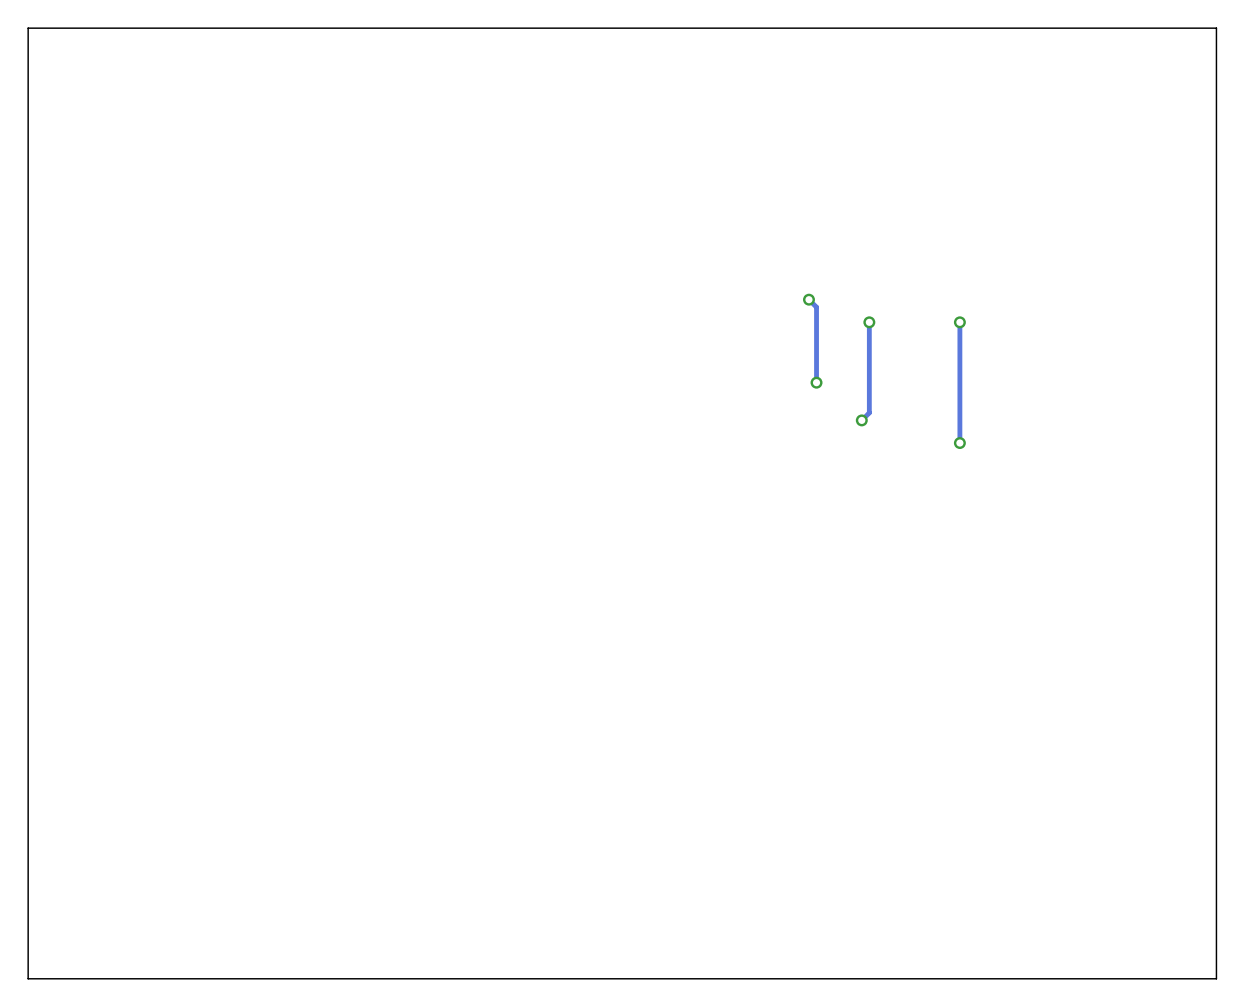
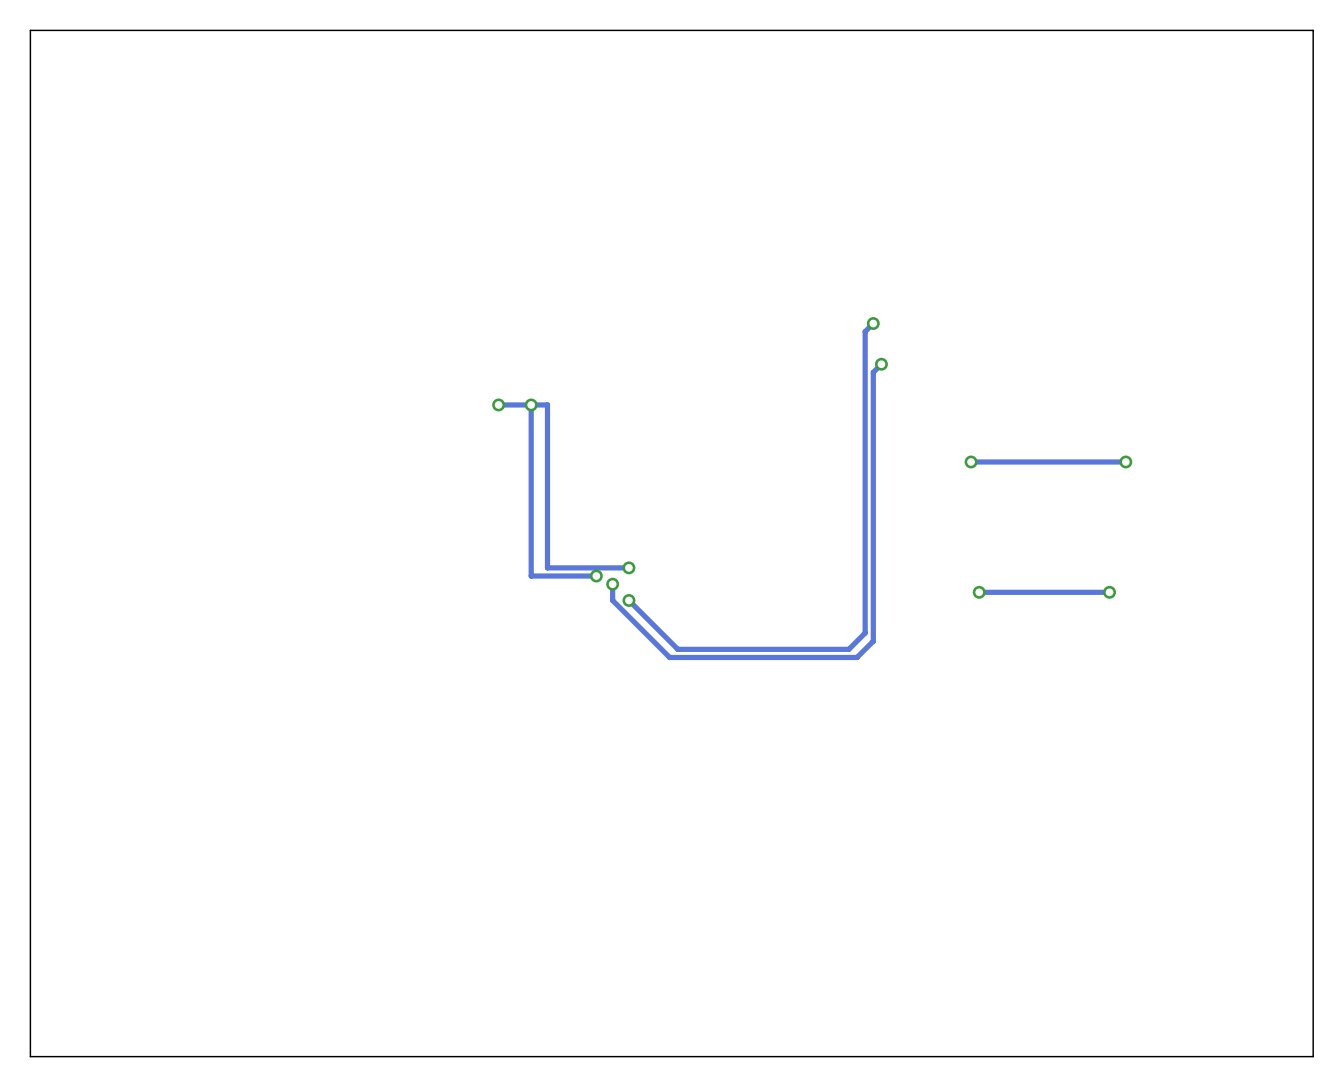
track: (808, 299) (816, 307) (816, 382) -> (873, 323) (865, 331) (865, 633) (848, 649) (677, 649) (628, 600)
track: (869, 322) (869, 412) (861, 420) -> none
via: (869, 322) -> none
track: (959, 322) (959, 443) -> none
via: (959, 322) -> none
track: none -> (881, 364) (873, 372) (873, 641) (857, 657) (669, 657) (612, 600) (612, 584)
via: none -> (881, 364)
track: none -> (498, 404) (547, 404) (547, 567) (628, 567)
via: none -> (498, 404)
track: none -> (531, 404) (531, 576) (596, 576)
via: none -> (531, 404)
via: (816, 382) -> none
via: (861, 420) -> none
via: none -> (971, 461)
track: none -> (1125, 461) (971, 461)
via: none -> (1125, 461)
via: (959, 443) -> none
via: none -> (628, 567)
via: none -> (596, 576)
via: none -> (612, 584)
via: none -> (979, 592)
track: none -> (1109, 592) (979, 592)
via: none -> (1109, 592)
via: none -> (628, 600)

